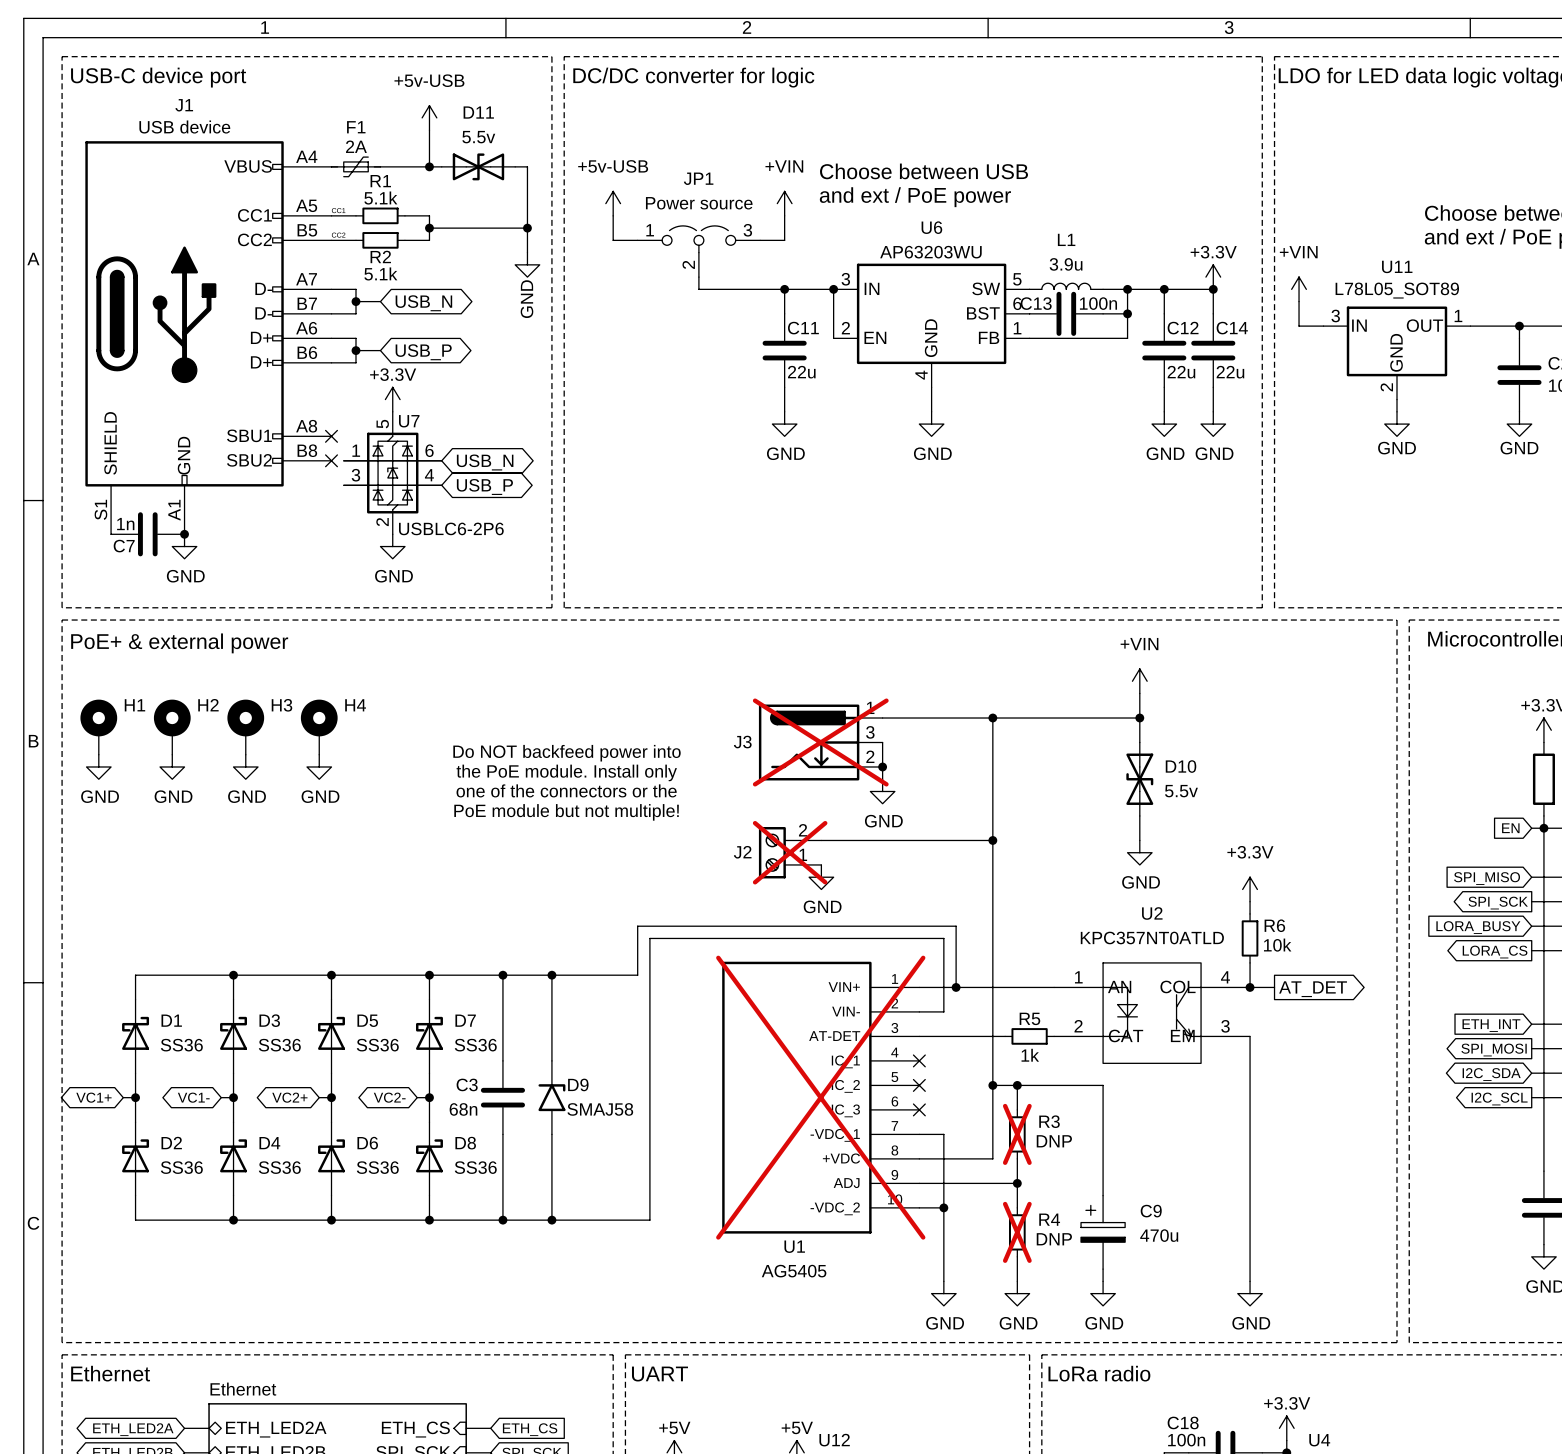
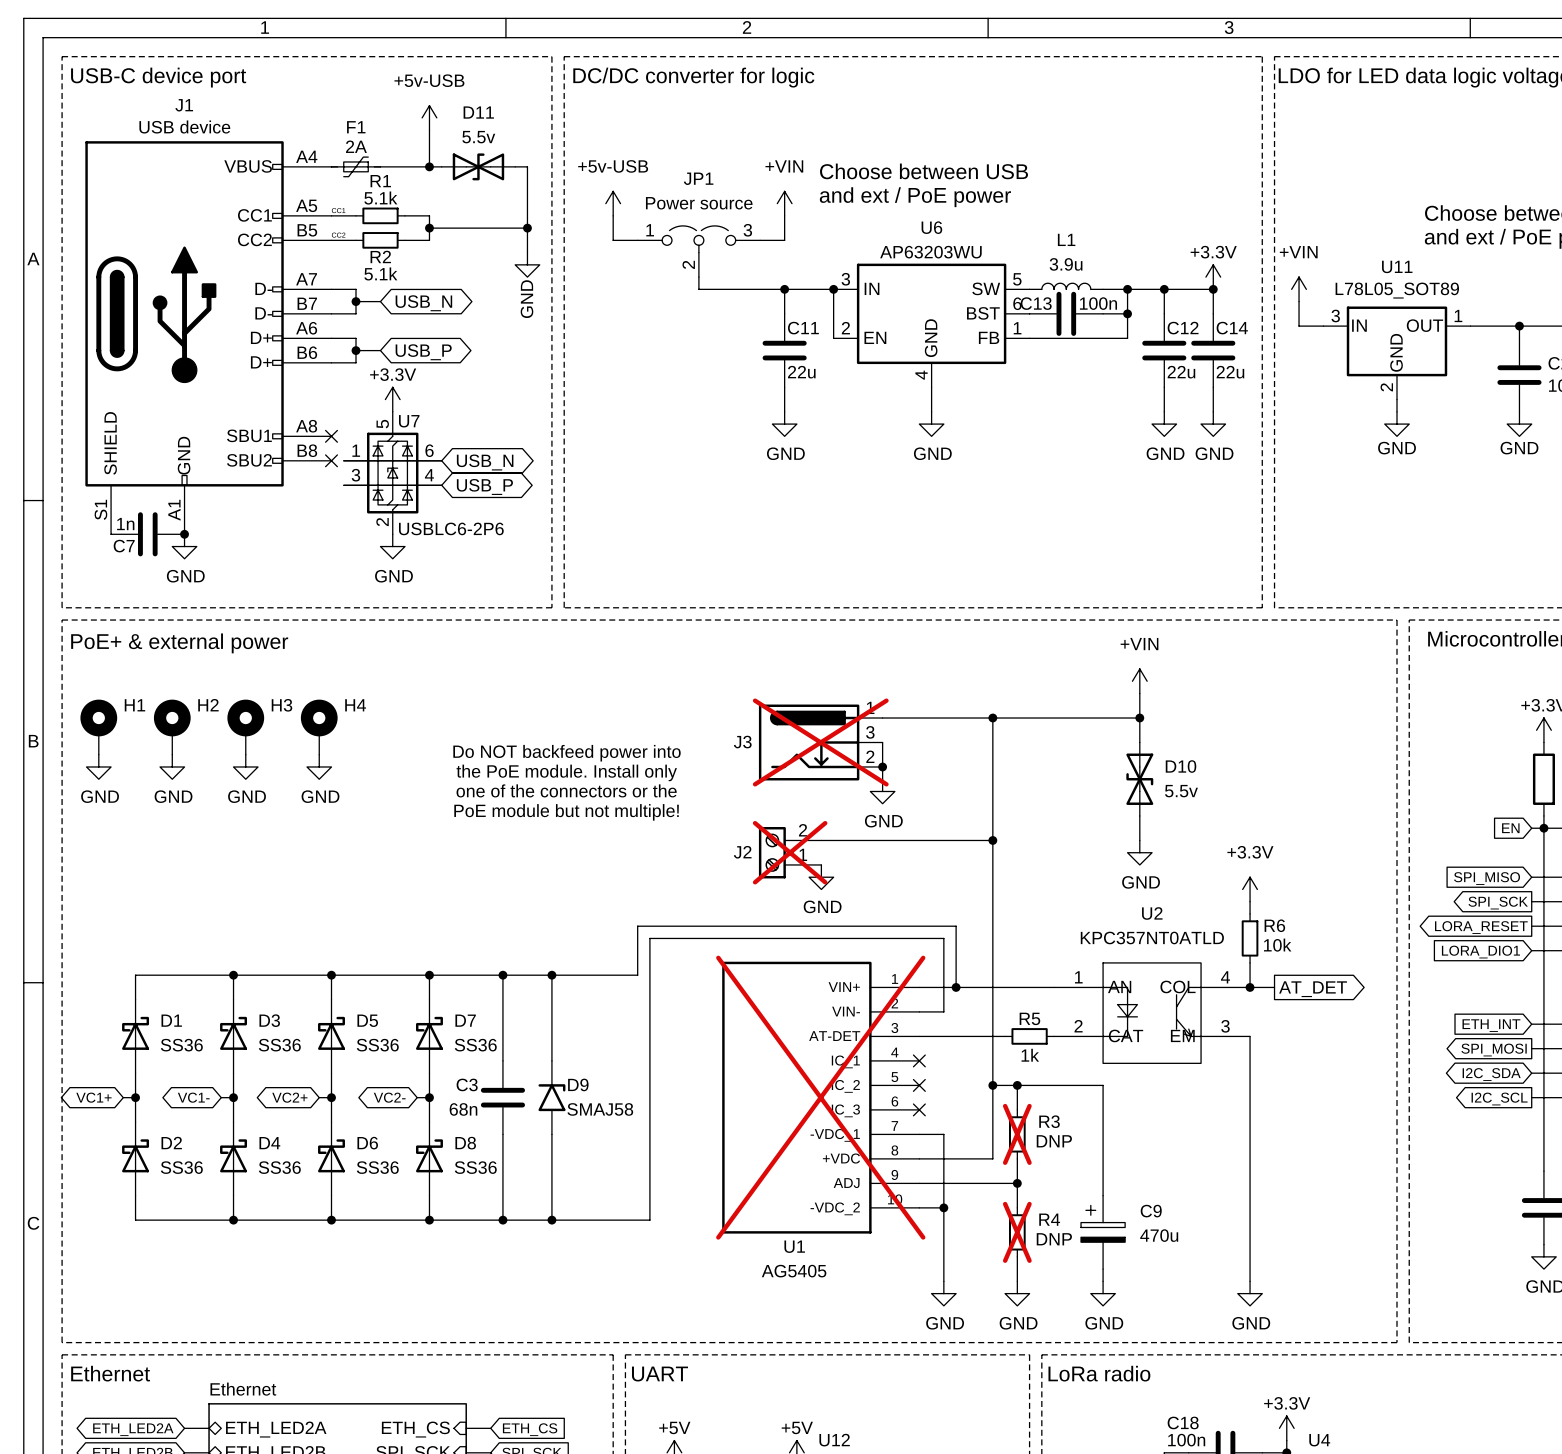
global label shape: input (1478, 927) -> output (1481, 927)
global label: LORA_BUSY (1478, 927) -> LORA_RESET (1481, 927)
global label shape: output (1495, 952) -> input (1480, 952)
global label: LORA_CS (1495, 952) -> LORA_DIO1 (1480, 952)

